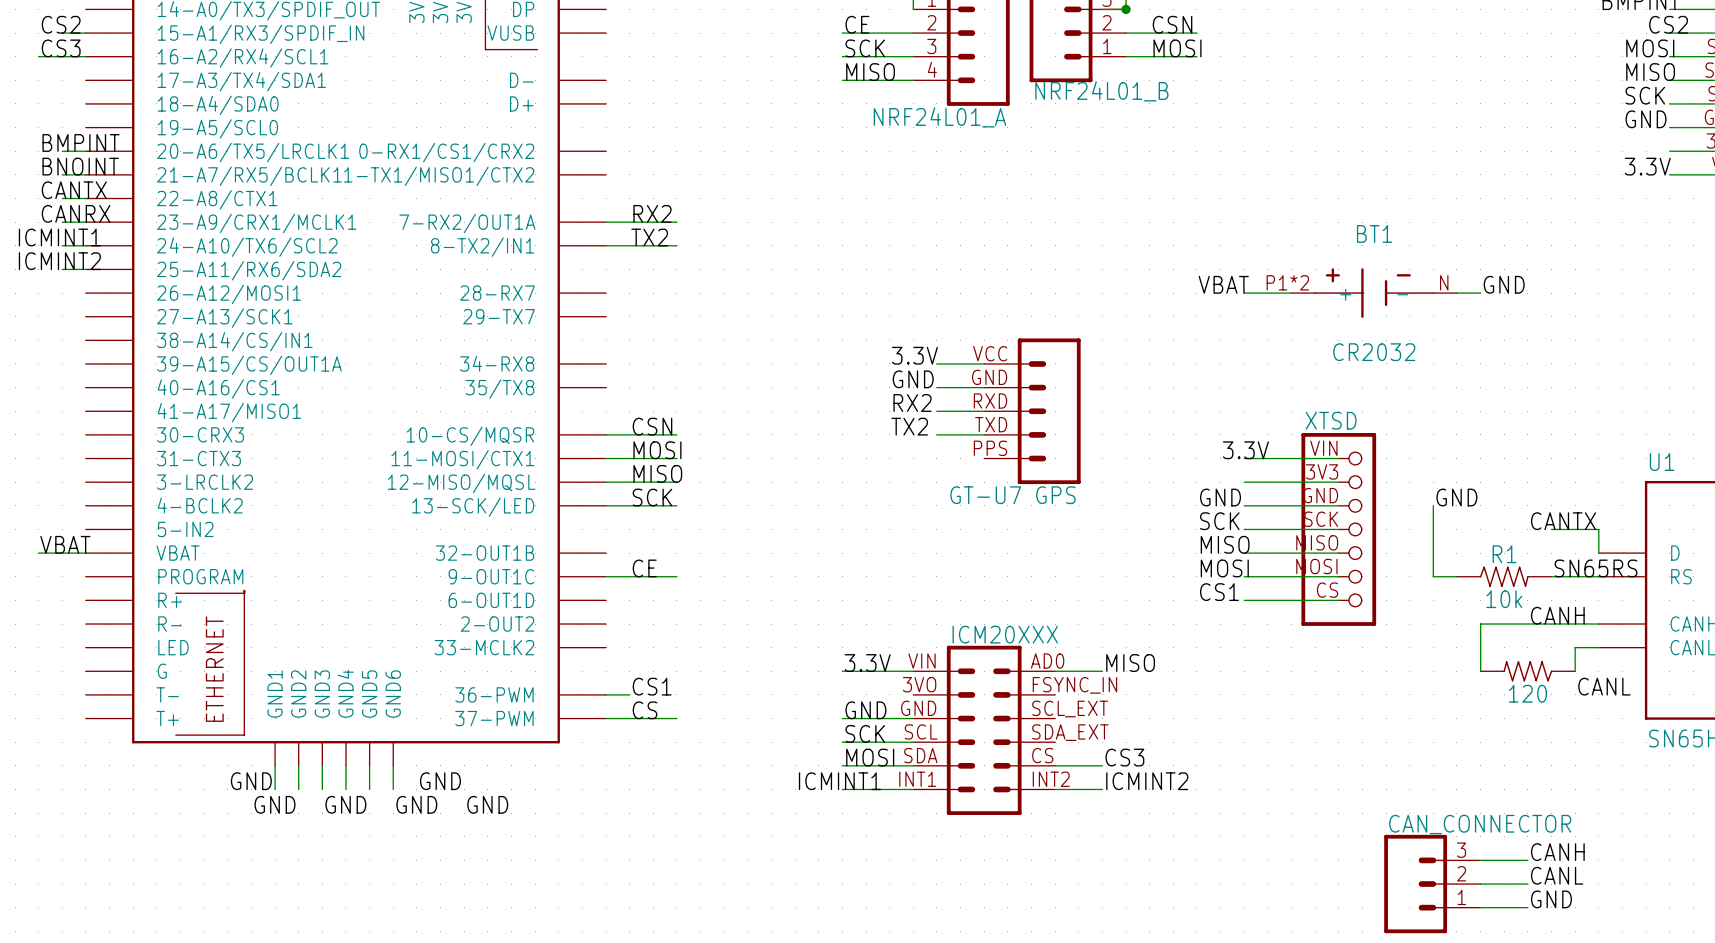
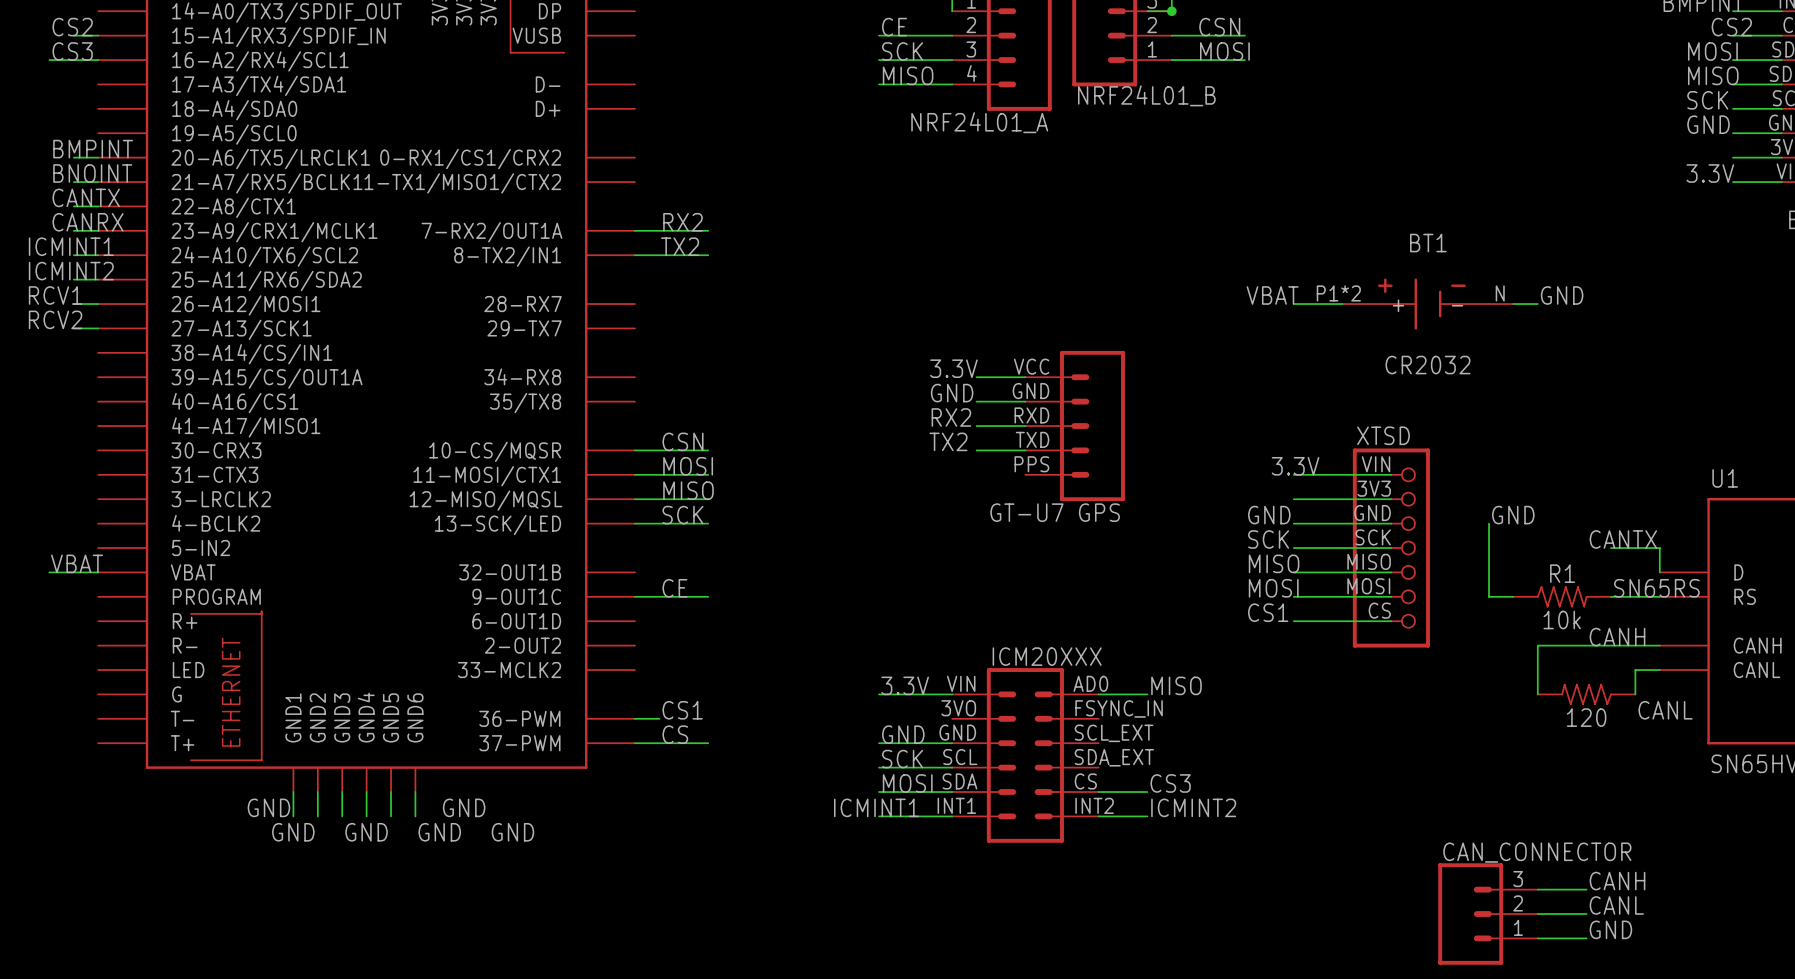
label: none -> RCV1 (55, 295)
wire: none -> (73, 304) (98, 304)
label: none -> RCV2 (55, 319)
wire: none -> (73, 328) (98, 328)

